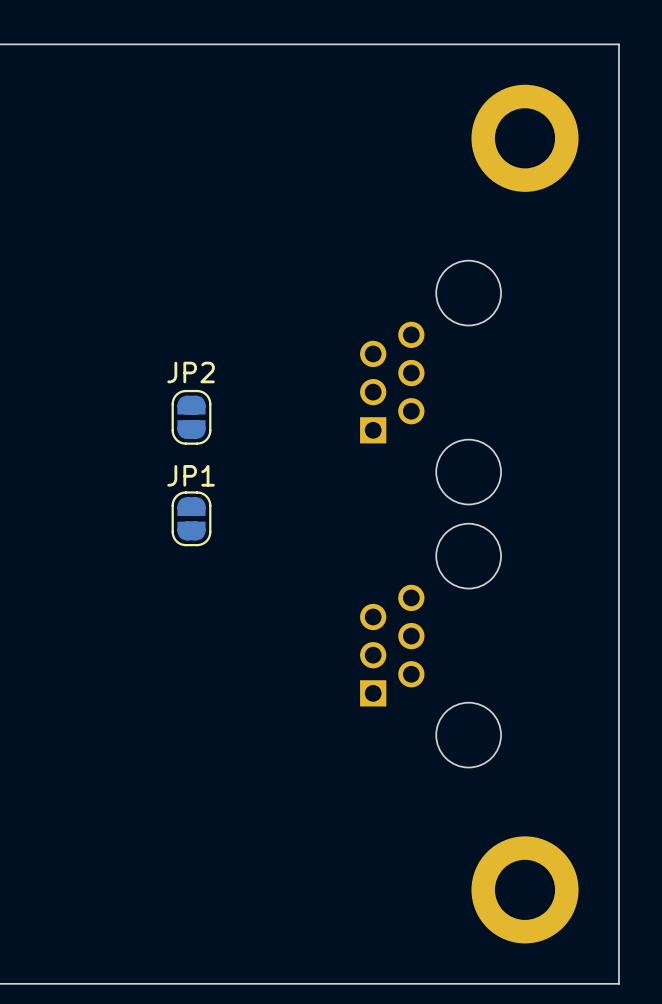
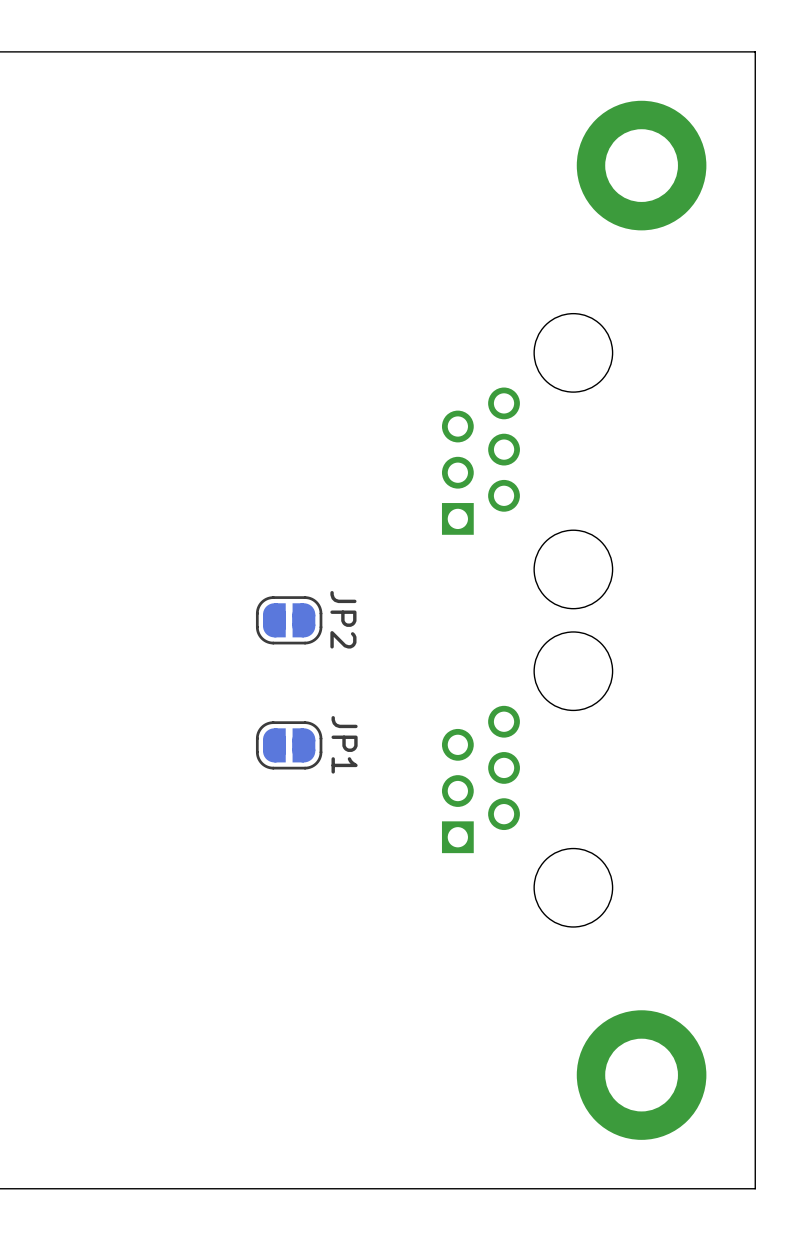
JP2 rotation: 0° (191, 417) -> 90° clockwise (289, 620)
JP2 position: (191, 417) -> (289, 620)
JP1 rotation: 0° (191, 518) -> 90° clockwise (289, 745)
JP1 position: (191, 518) -> (289, 745)

